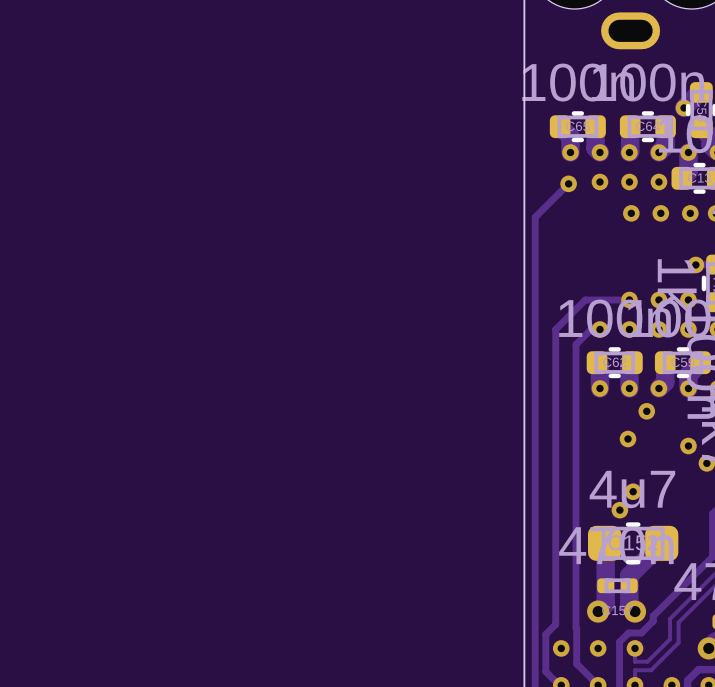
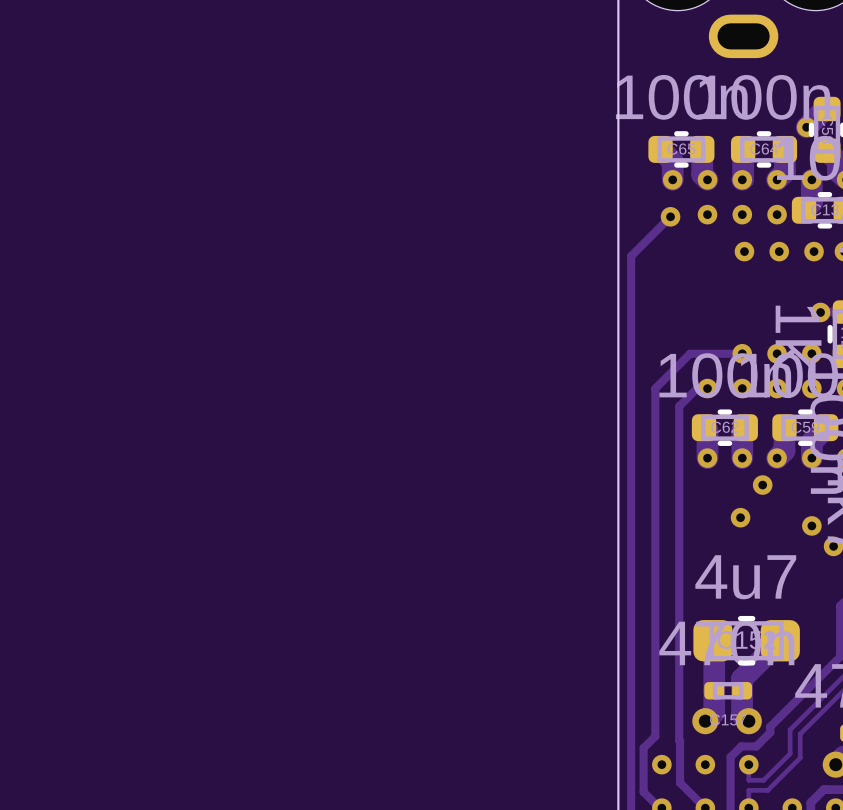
via: (633, 491) -> none
via: (619, 510) -> none

